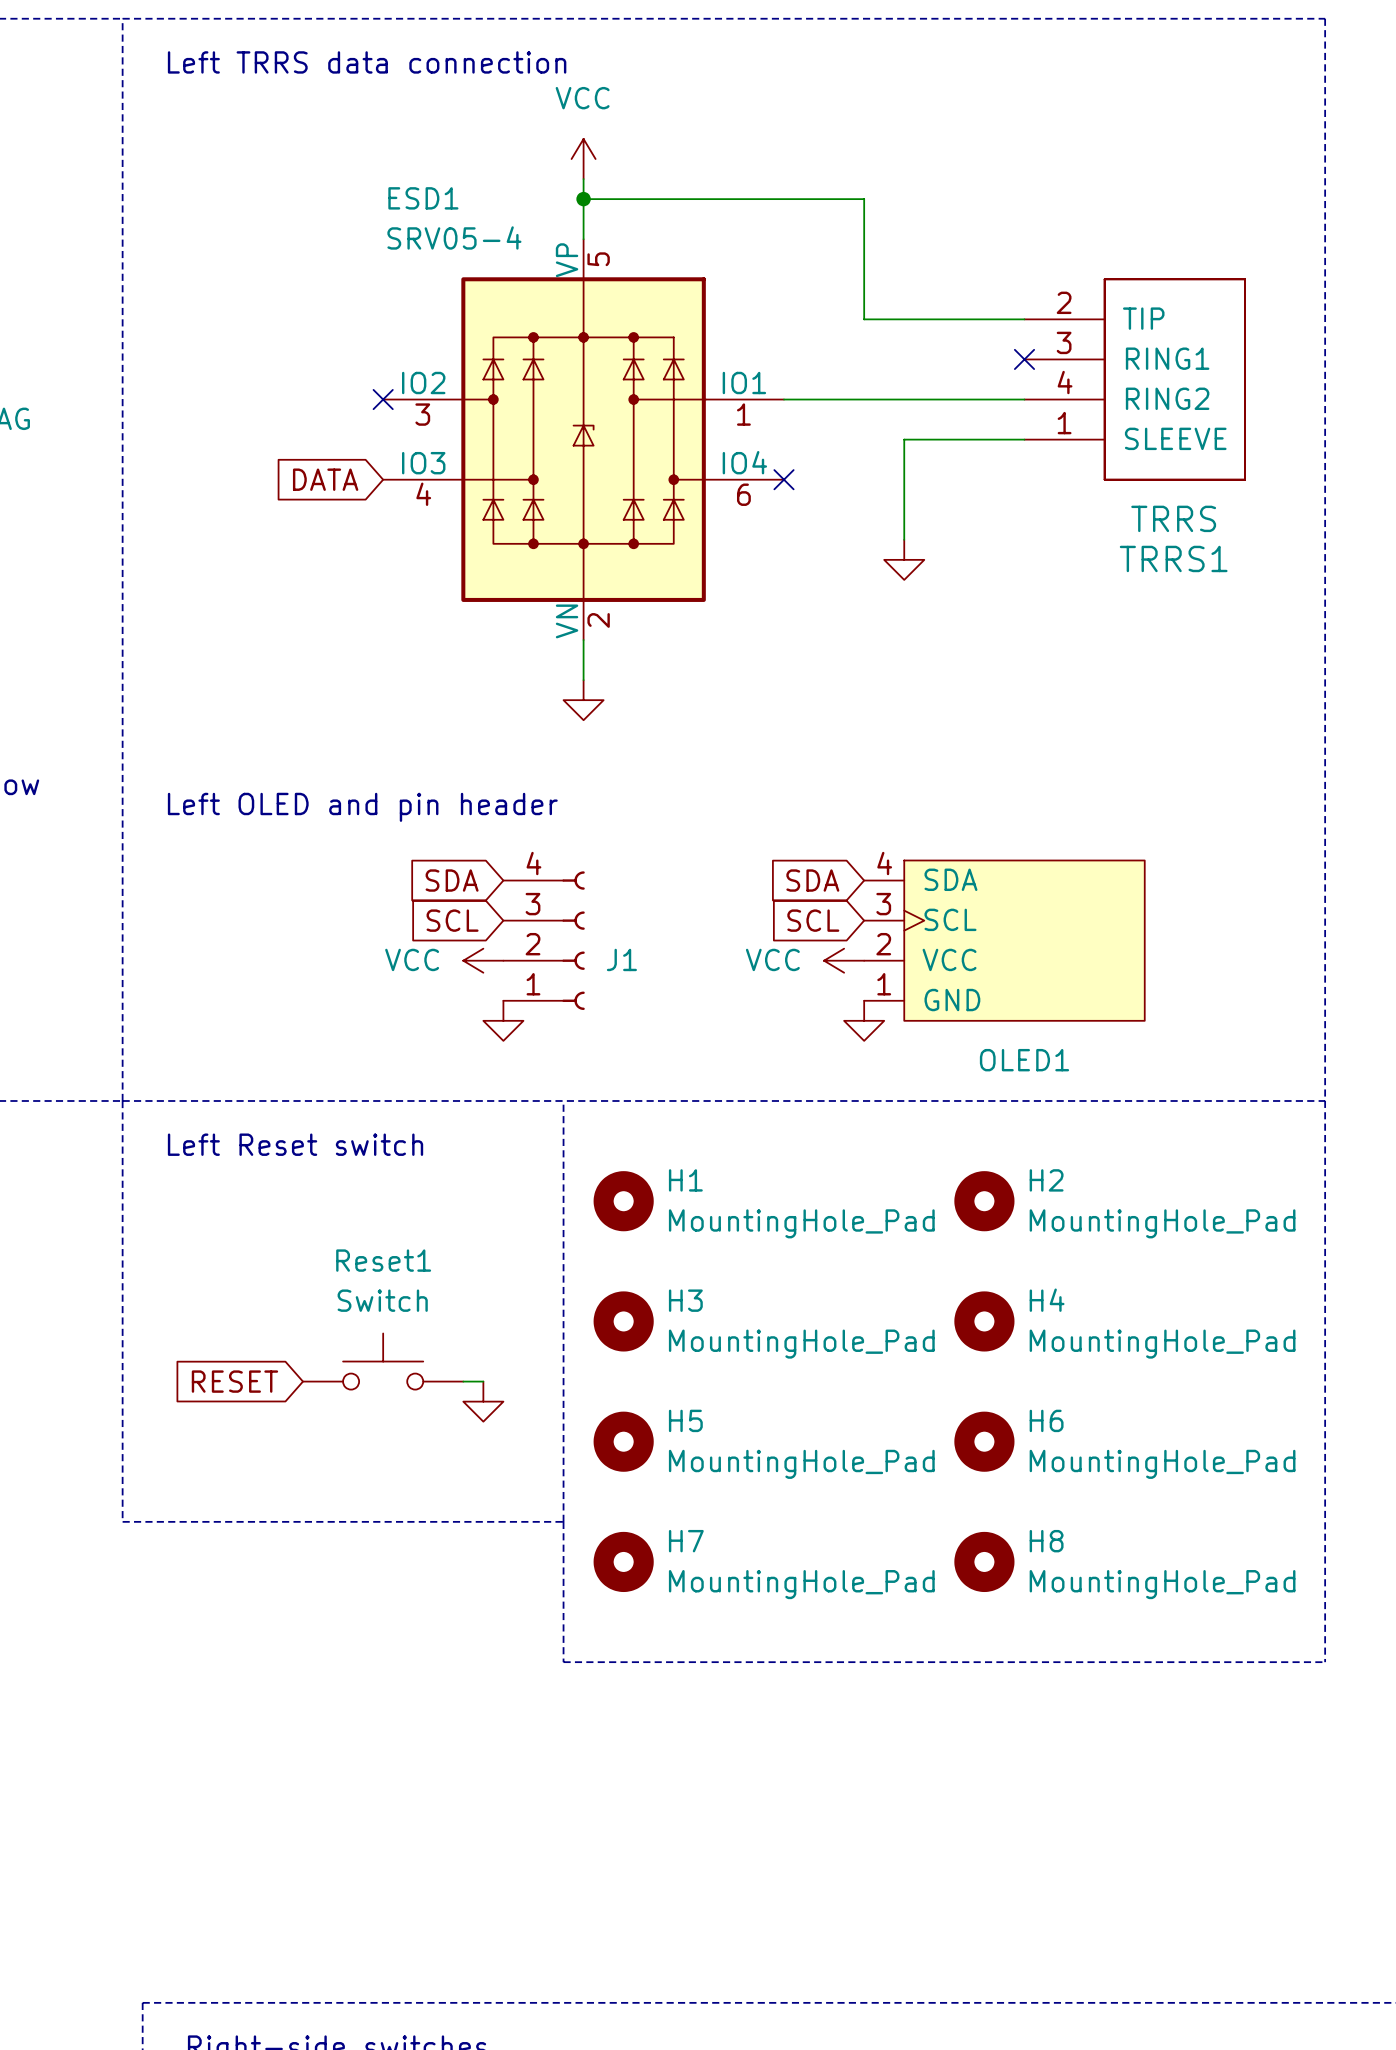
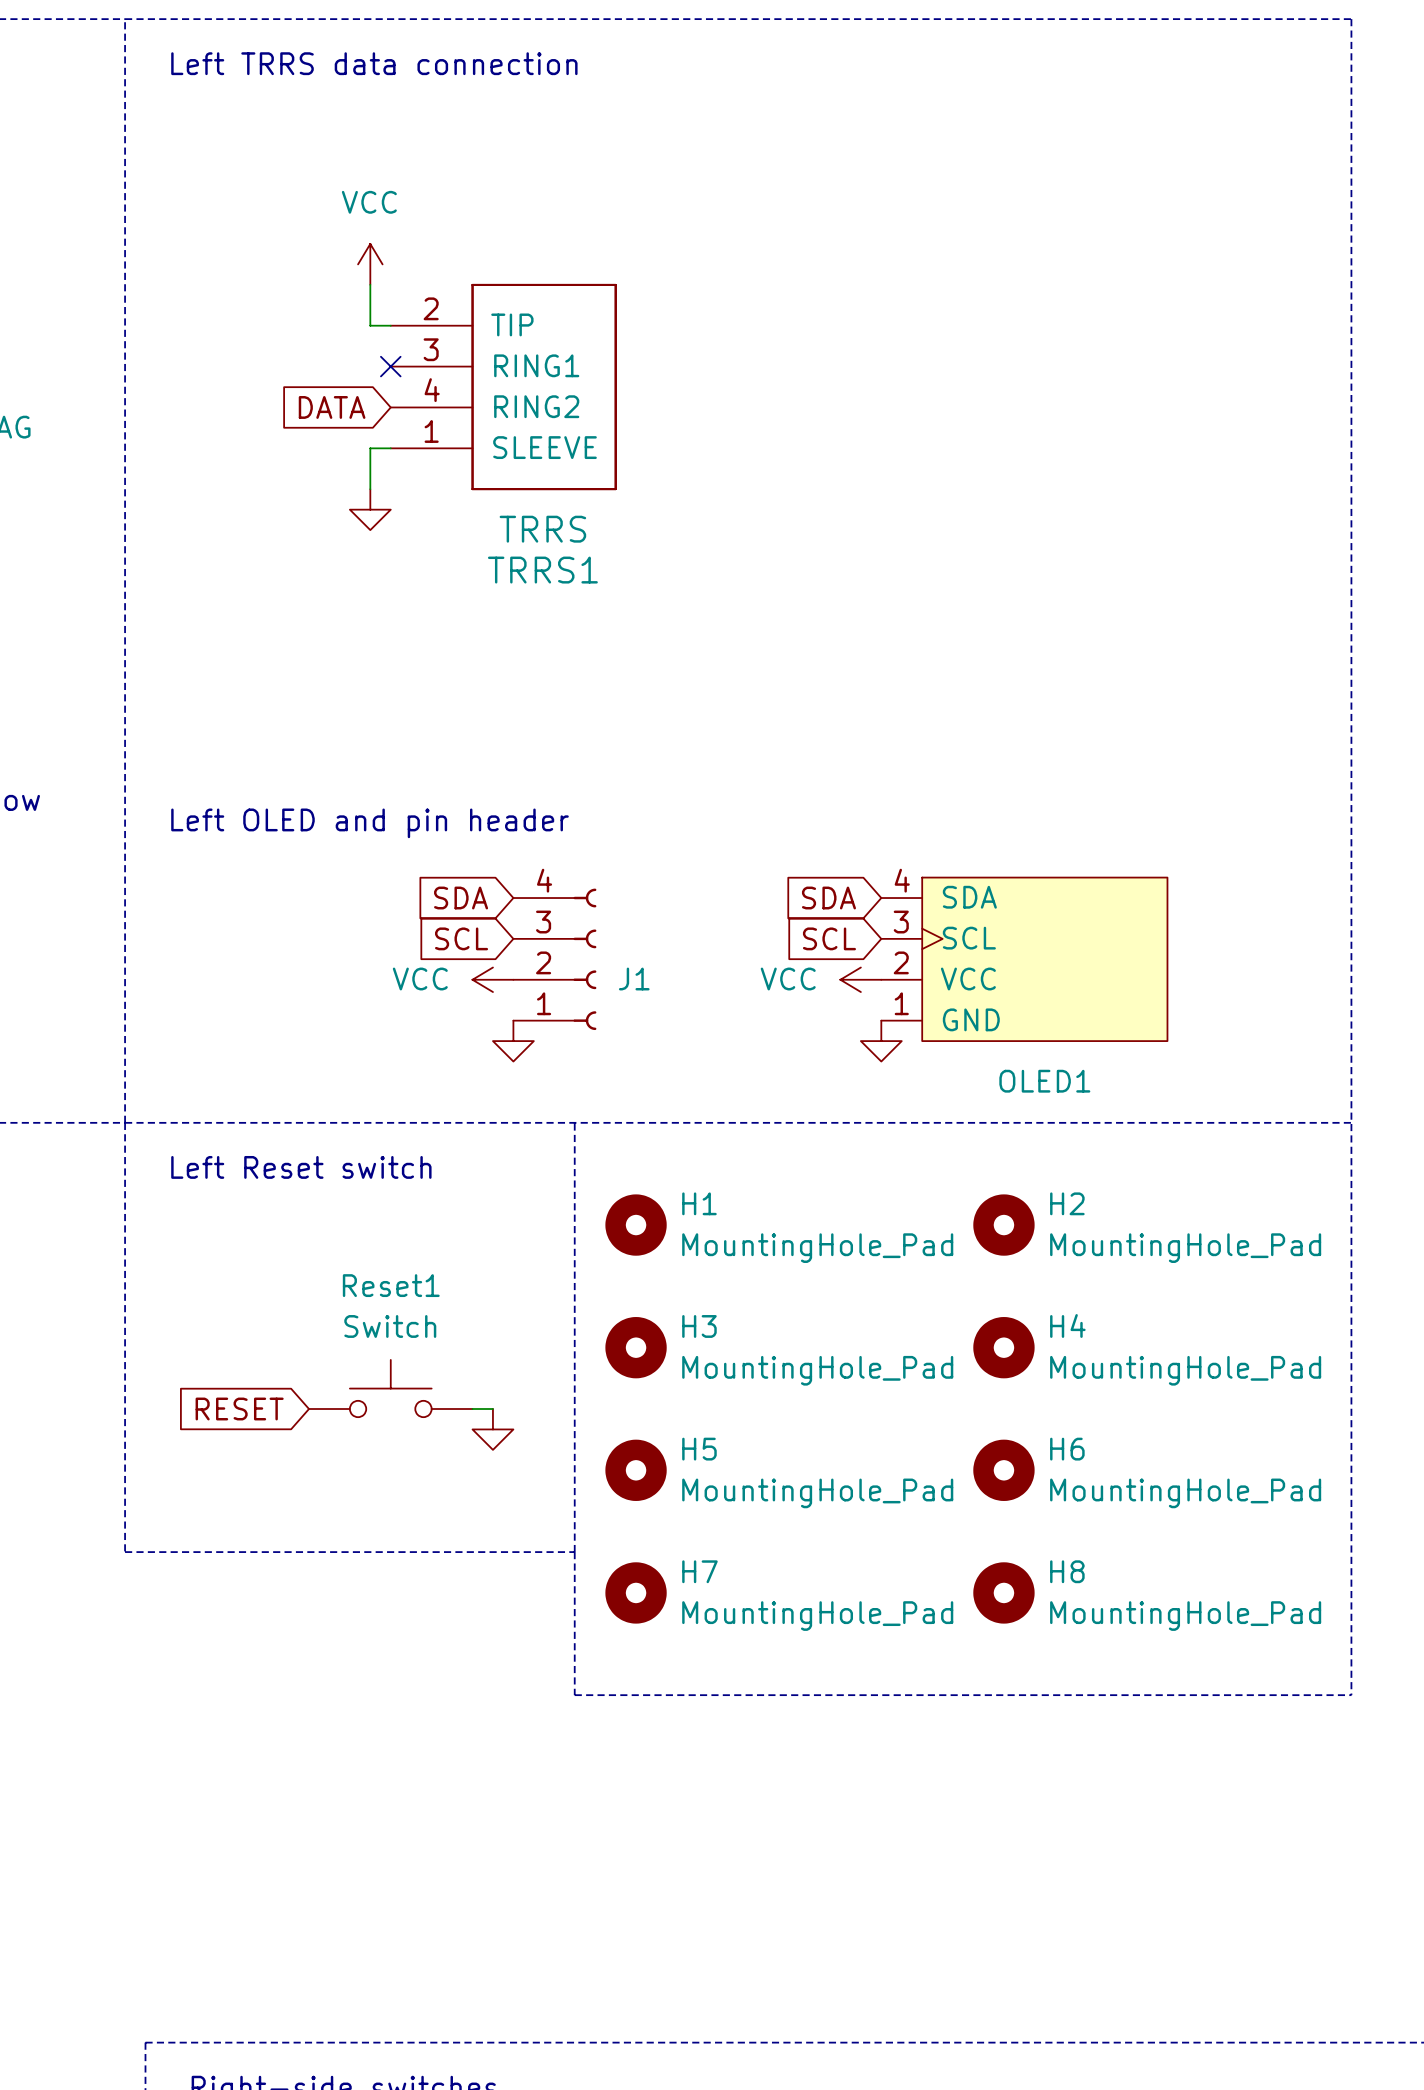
power symbol position: VCC (583, 159) -> VCC (370, 264)
wire: (583, 179) (583, 239) -> none
wire: (583, 199) (864, 199) (864, 319) (1024, 319) -> none
junction: (583, 199) -> none
wire: none -> (370, 284) (370, 325) (390, 325)
no-connect mark: (1024, 359) -> none
TRRS1 position: (1134, 379) -> (503, 387)
no-connect mark position: (383, 399) -> (390, 366)
wire: (784, 399) (1024, 399) -> none
wire: none -> (390, 448) (370, 448) (370, 489)
ESD1: SRV05-4 (583, 439) -> none
wire: (1024, 439) (904, 439) (904, 539) -> none
global label position: DATA (325, 479) -> DATA (332, 407)
no-connect mark: (784, 479) -> none
power symbol: none -> (370, 509)
power symbol: (904, 559) -> none
wire: (583, 640) (583, 680) -> none
power symbol: (583, 700) -> none

